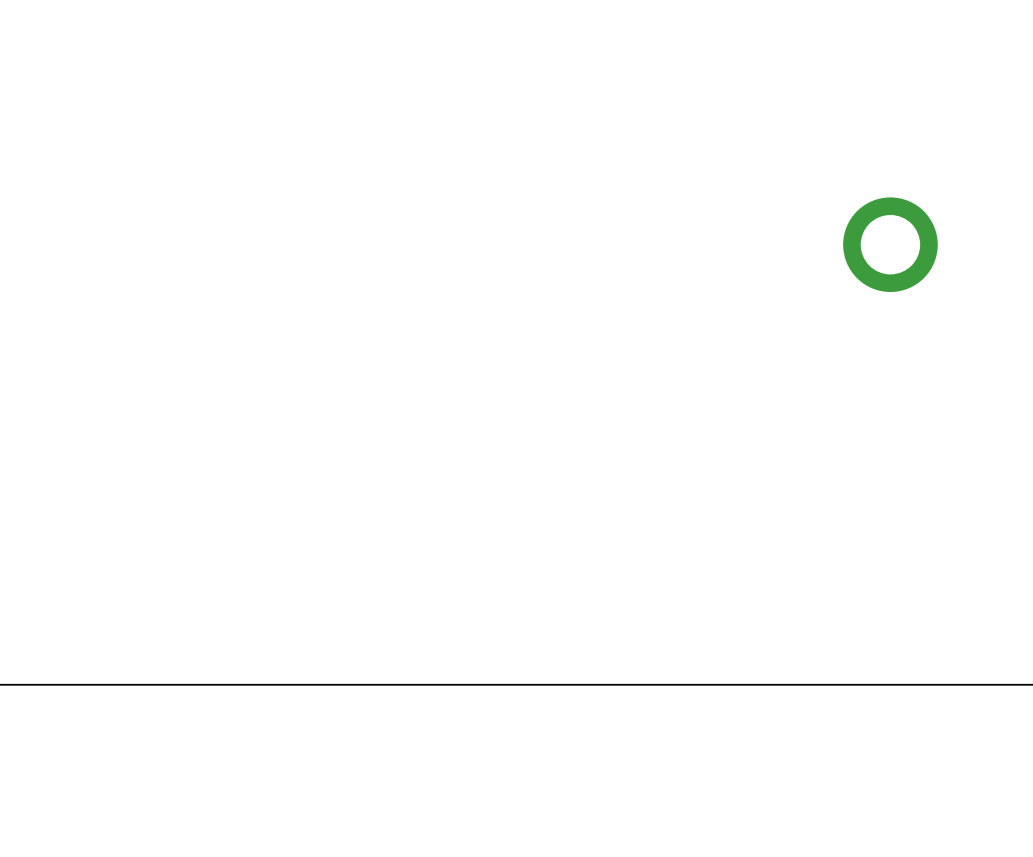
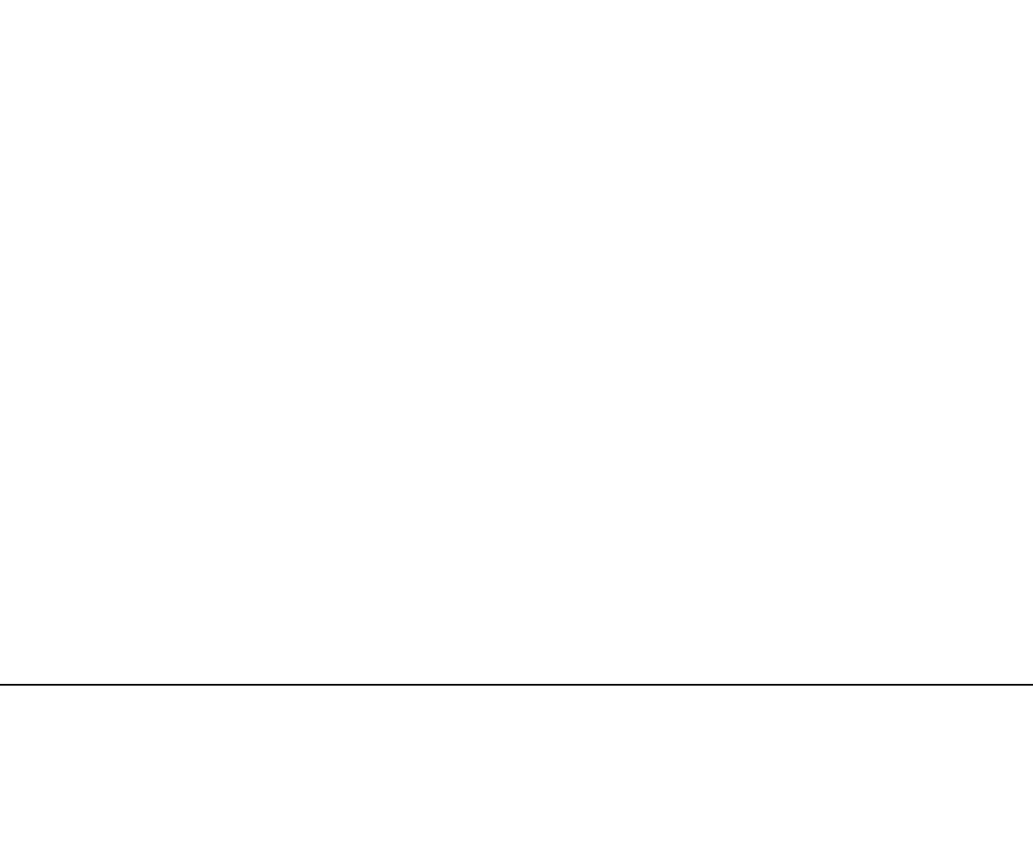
via: (890, 244) -> none

